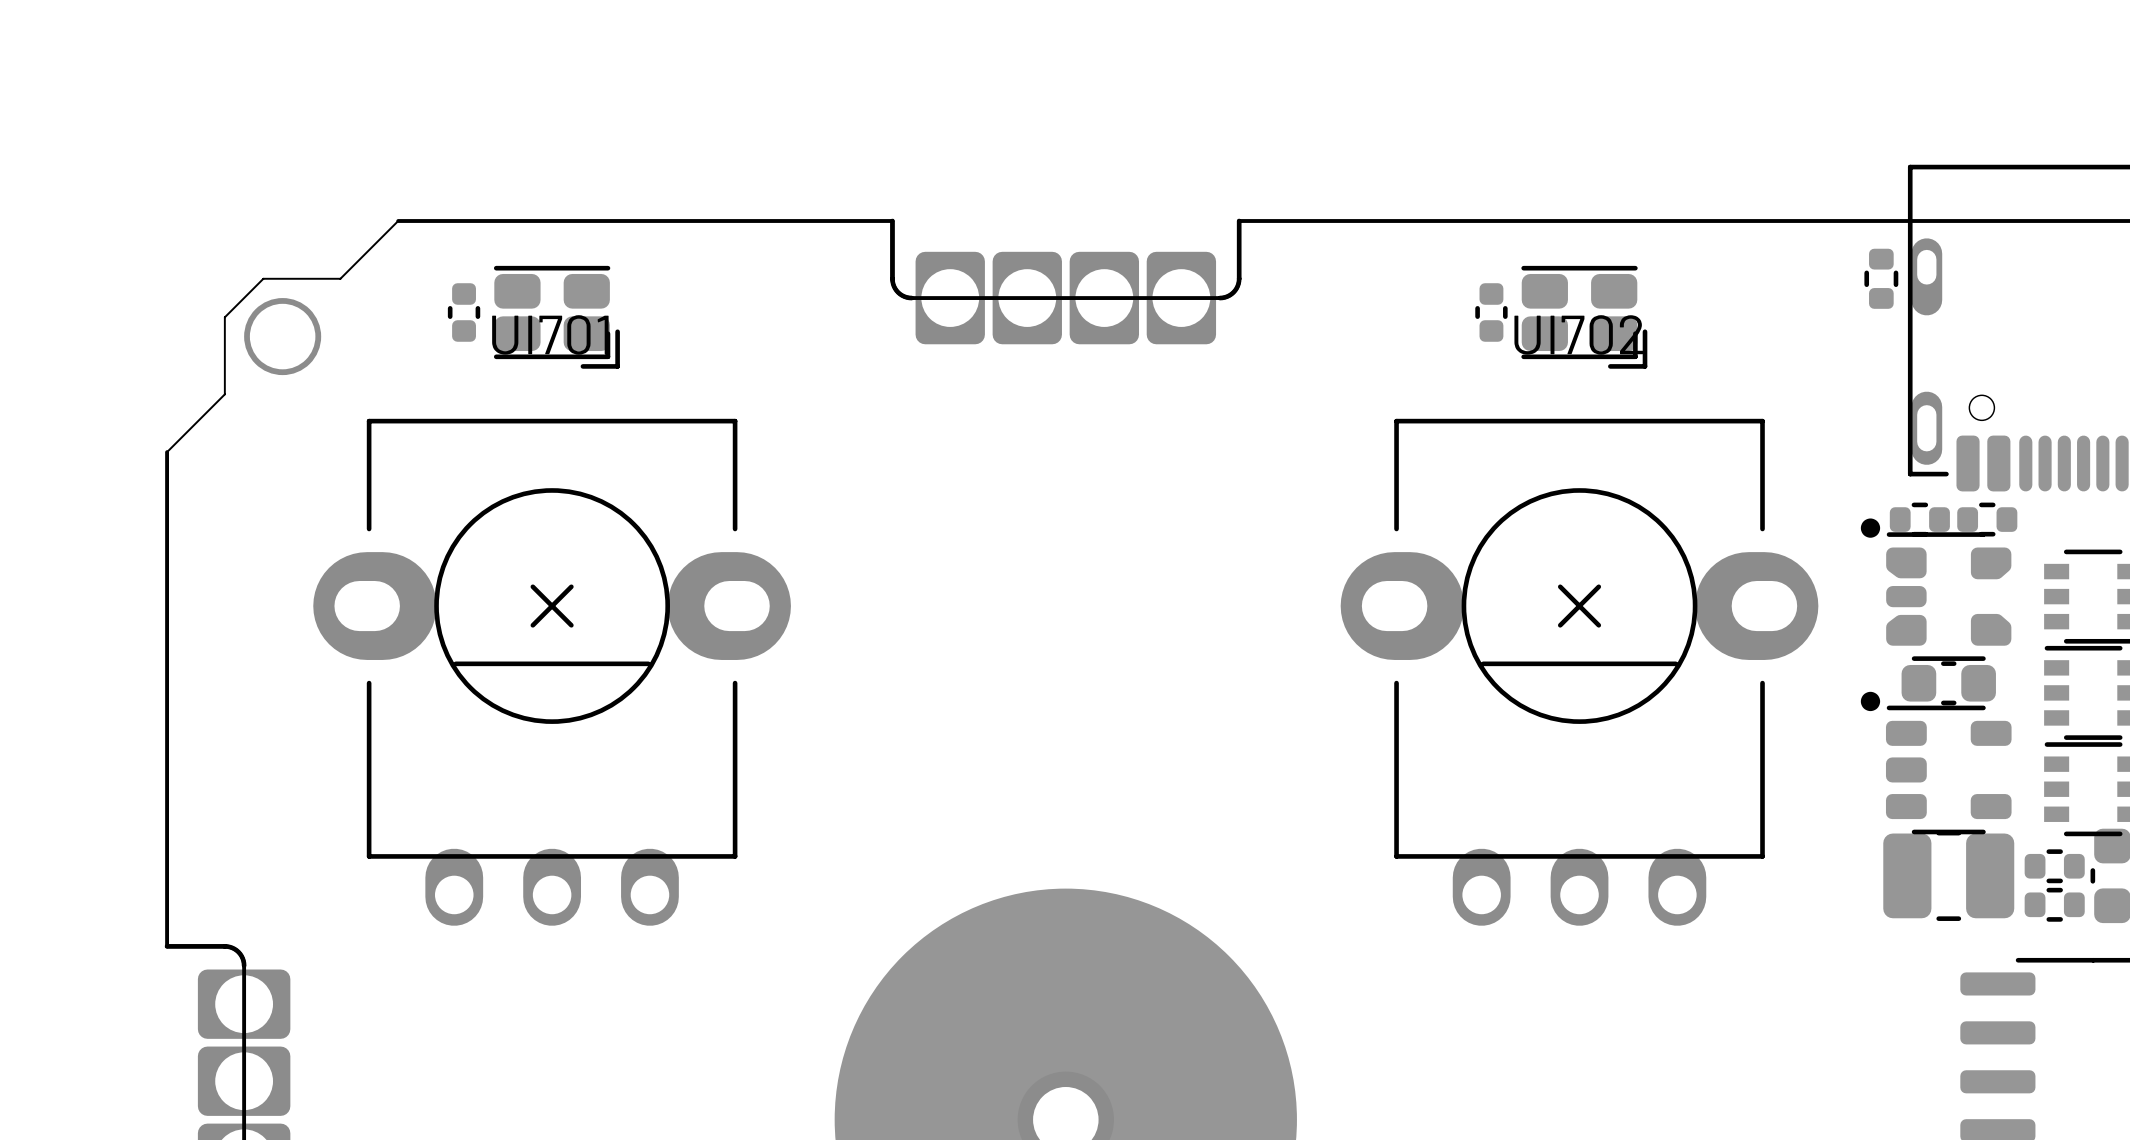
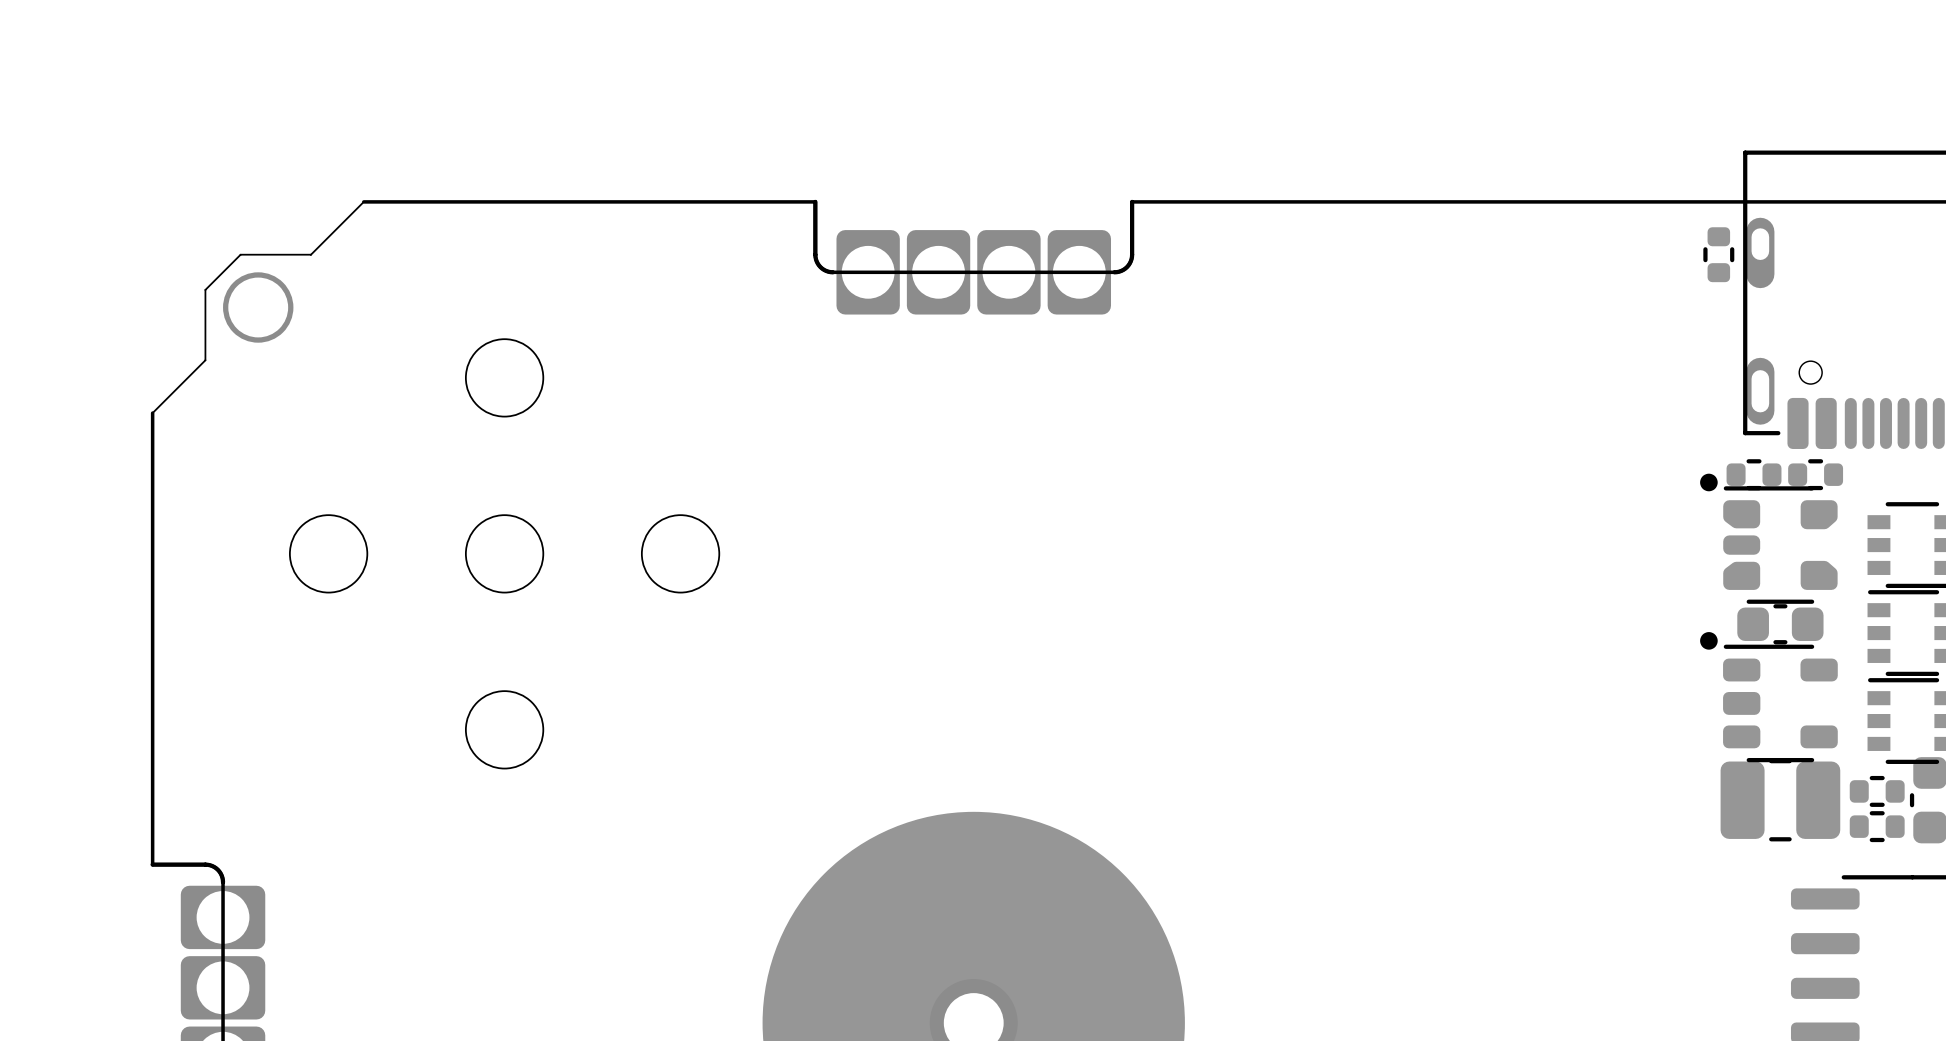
part: (464, 312) -> none
part: (1491, 312) -> none
part: (556, 317) -> none
part: (1584, 317) -> none
round board edge: none -> [464, 338, 545, 418]
round board edge: none -> [289, 514, 369, 594]
round board edge: none -> [464, 514, 545, 594]
round board edge: none -> [640, 514, 721, 594]
UI701: (552, 672) -> none
UI702: (1579, 672) -> none
round board edge: none -> [464, 690, 545, 770]

